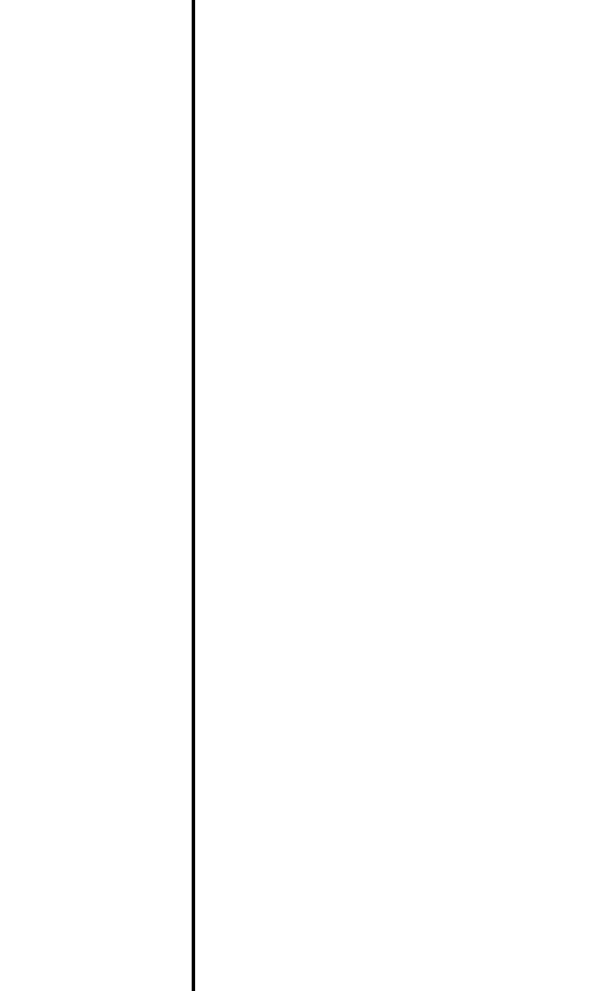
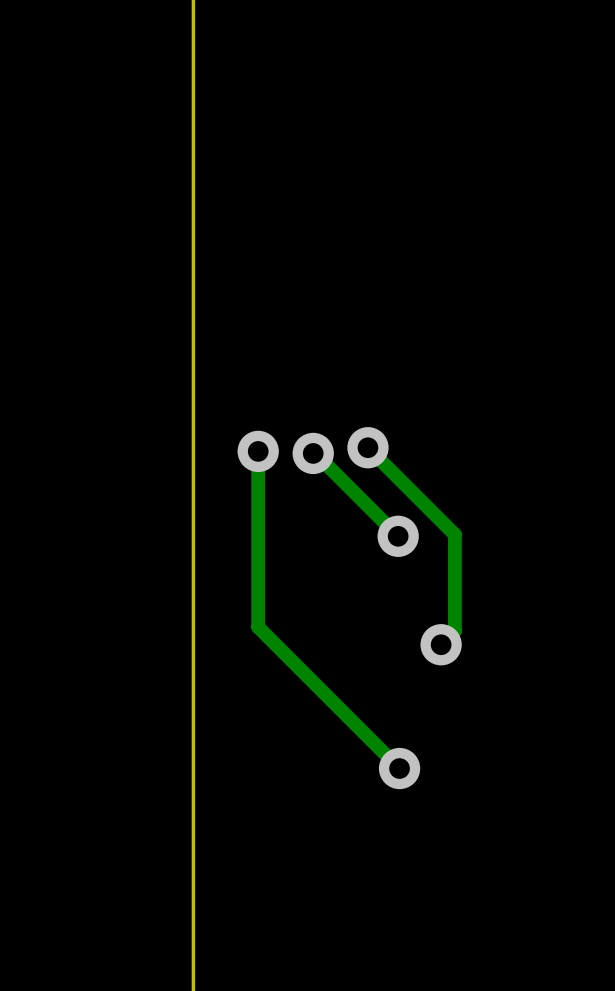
track: none -> (367, 447) (454, 534) (454, 630) (441, 644)
via: none -> (367, 447)
track: none -> (258, 451) (258, 627) (399, 768)
via: none -> (258, 451)
track: none -> (313, 453) (398, 536)
via: none -> (313, 453)
via: none -> (398, 536)
via: none -> (441, 644)
via: none -> (399, 768)

